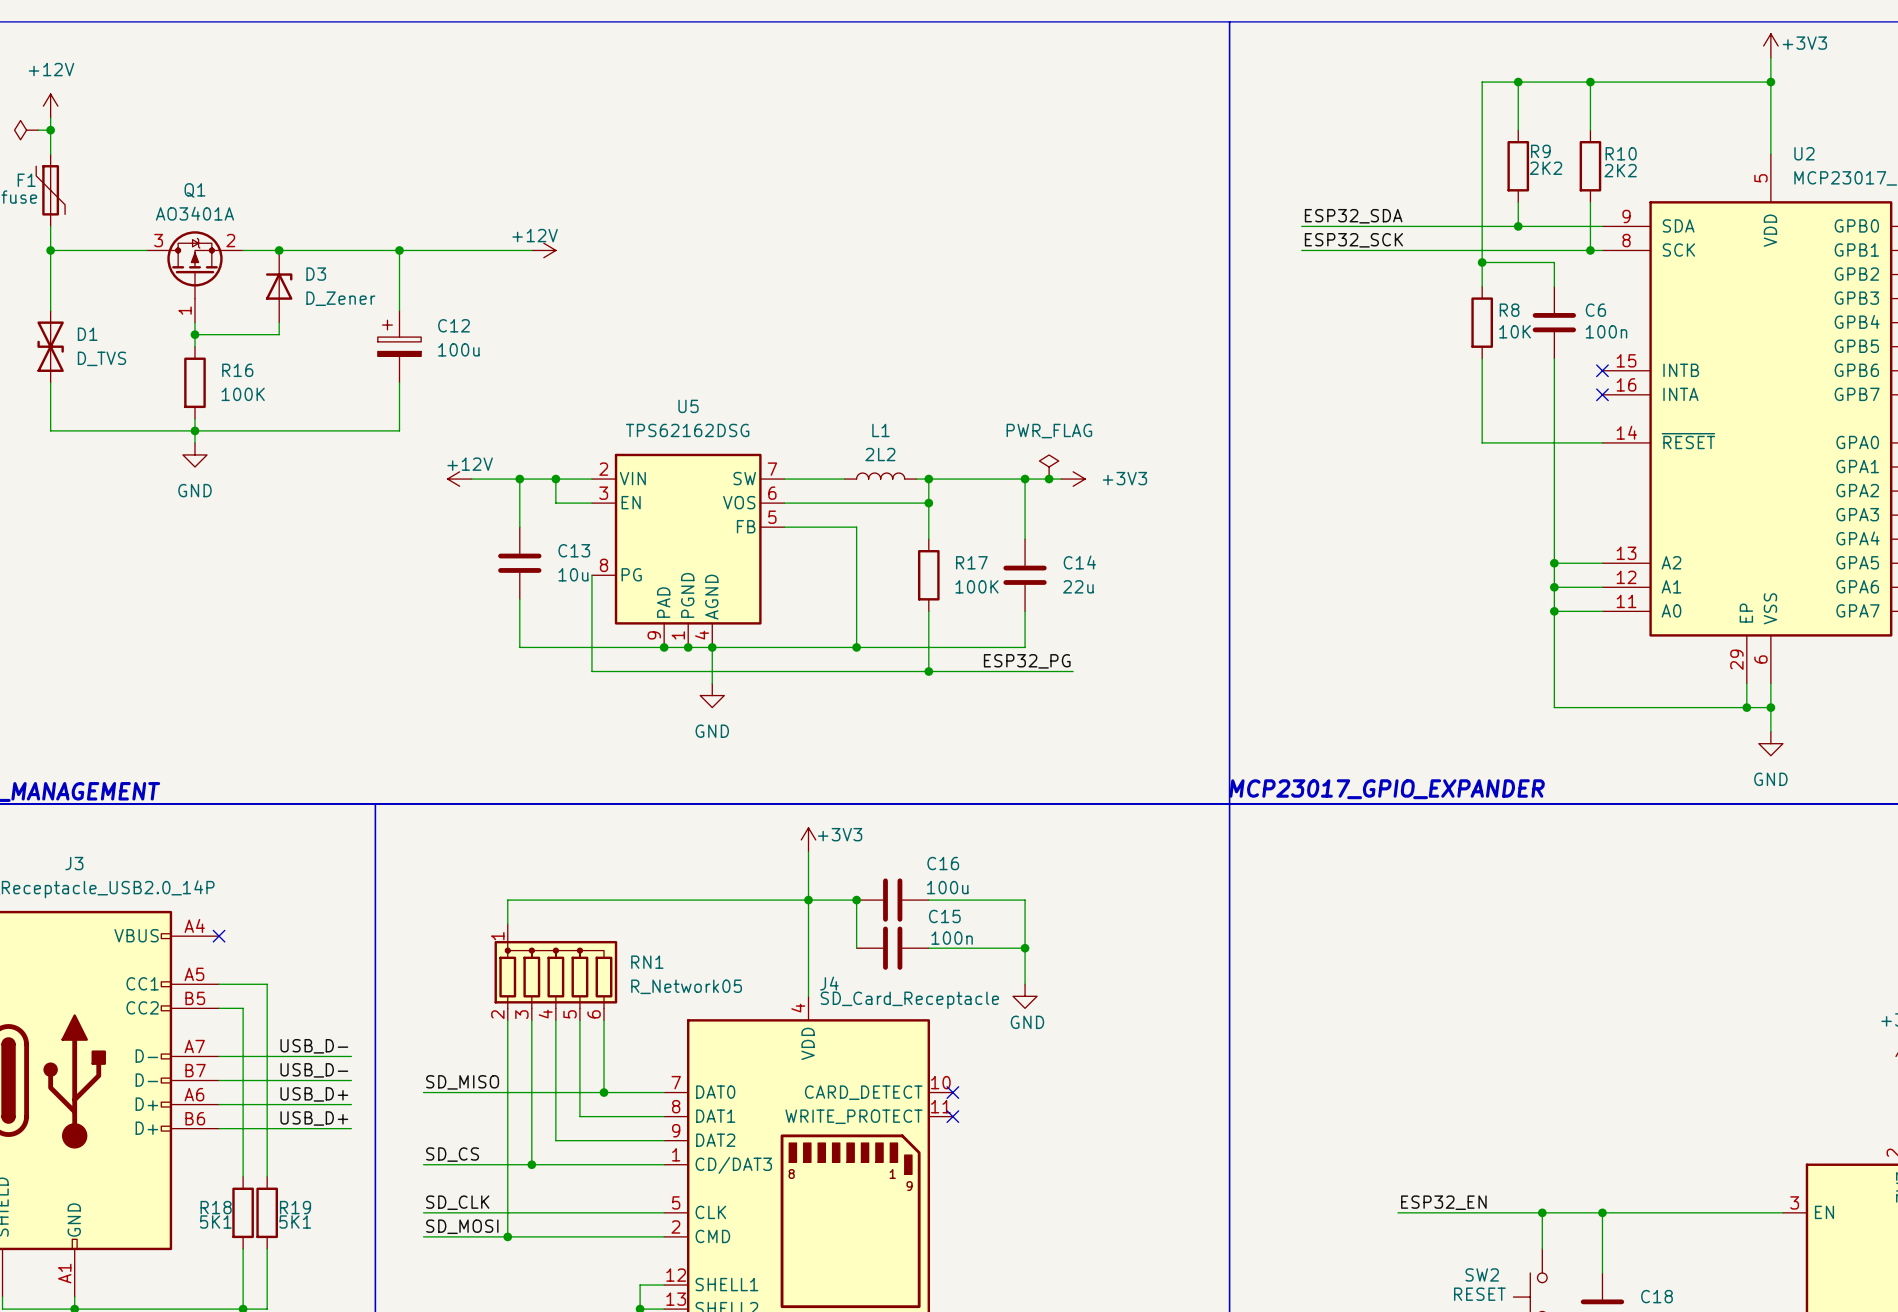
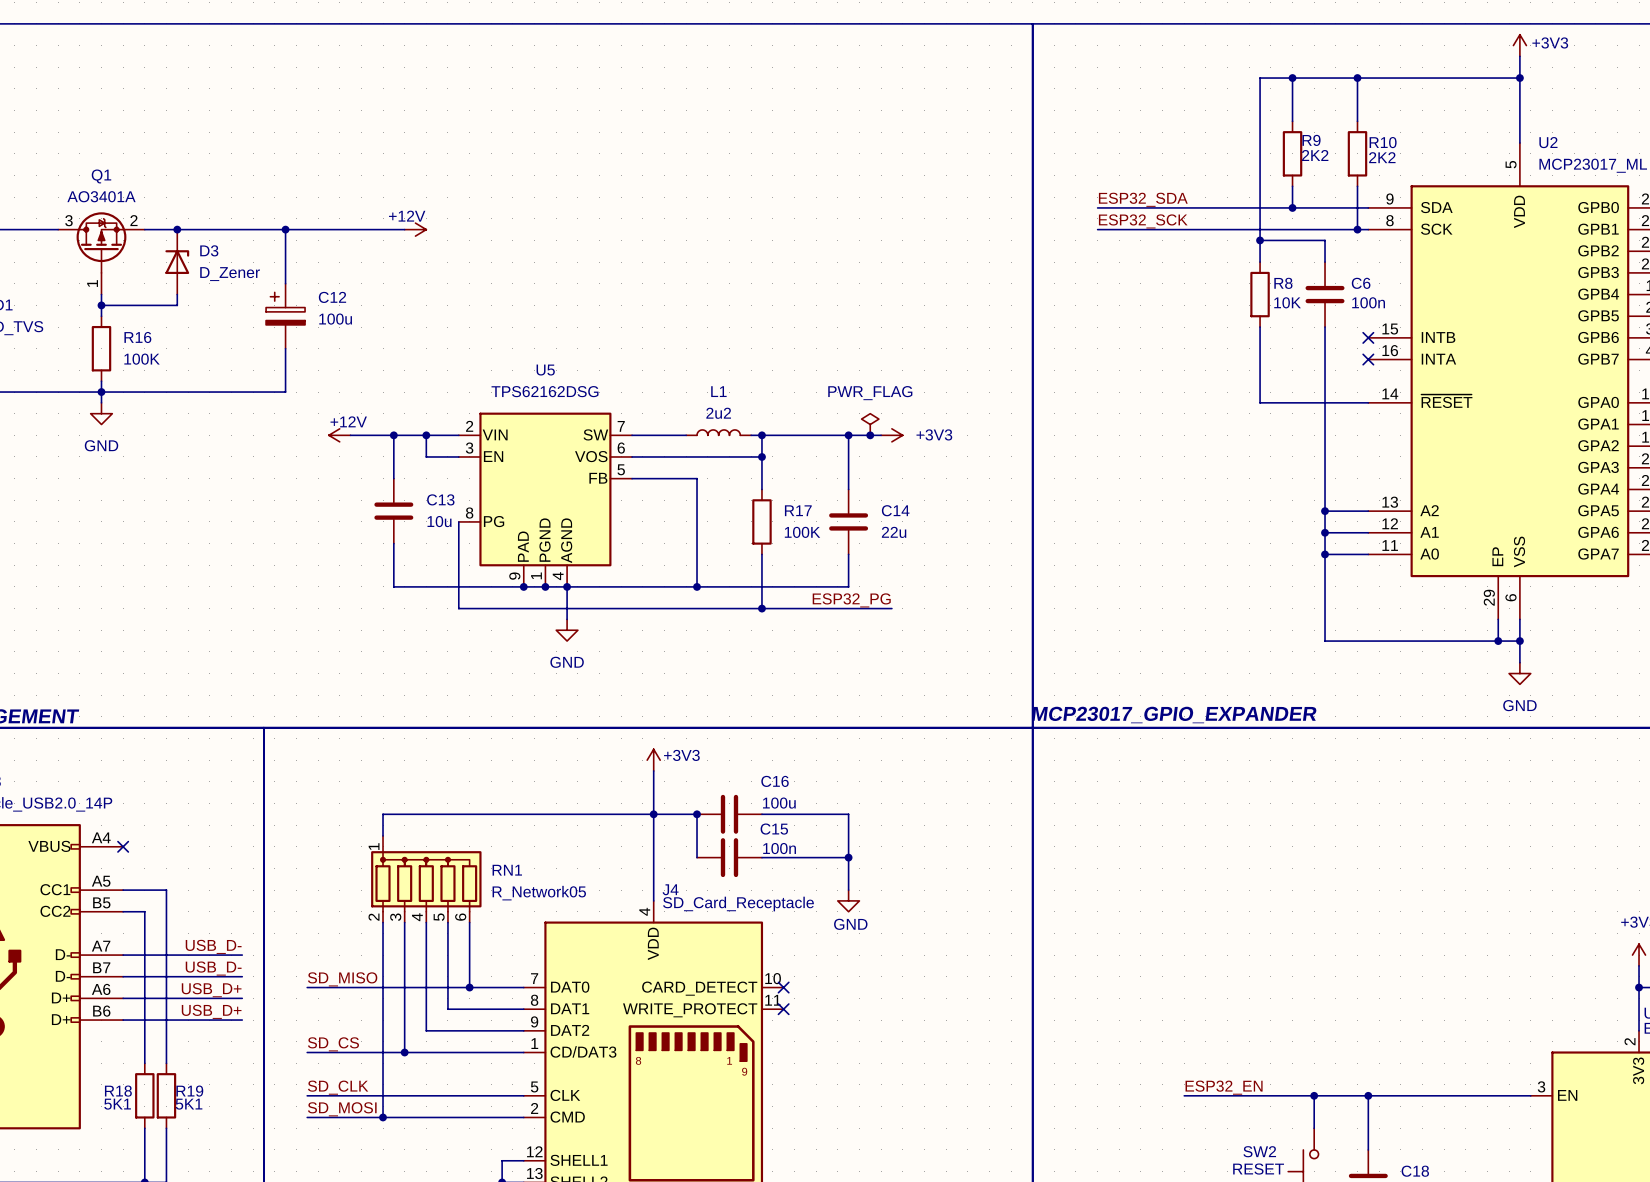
L1 value: 2L2 (880, 454) -> 2u2 (718, 413)

